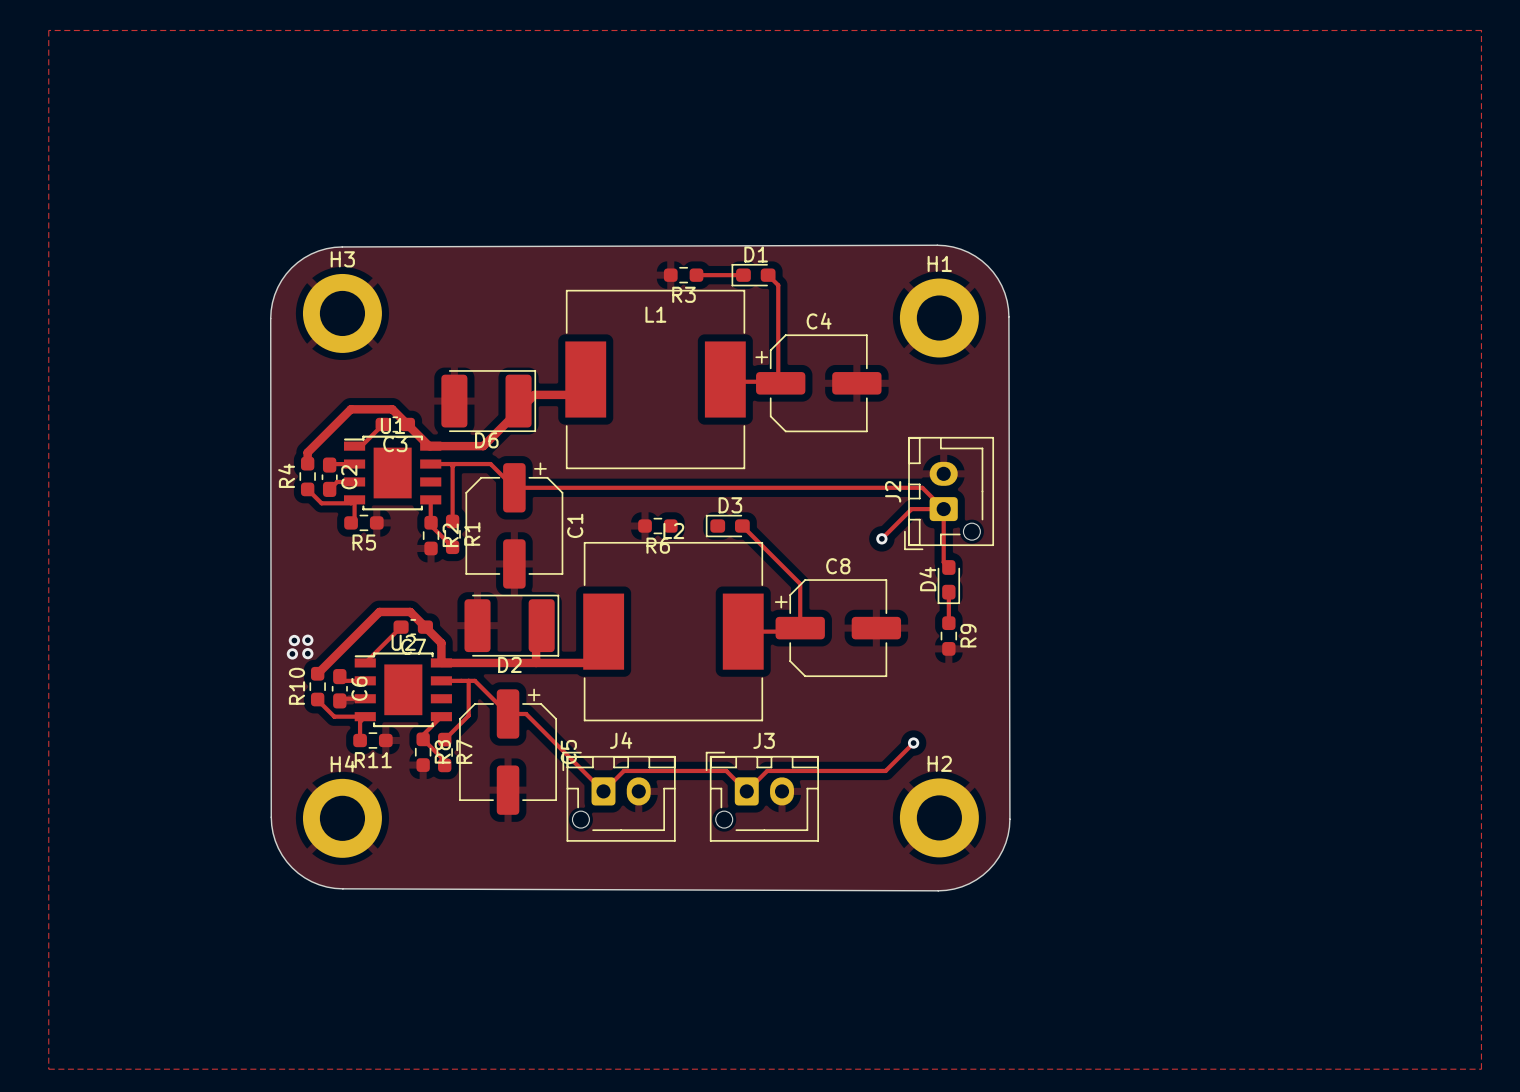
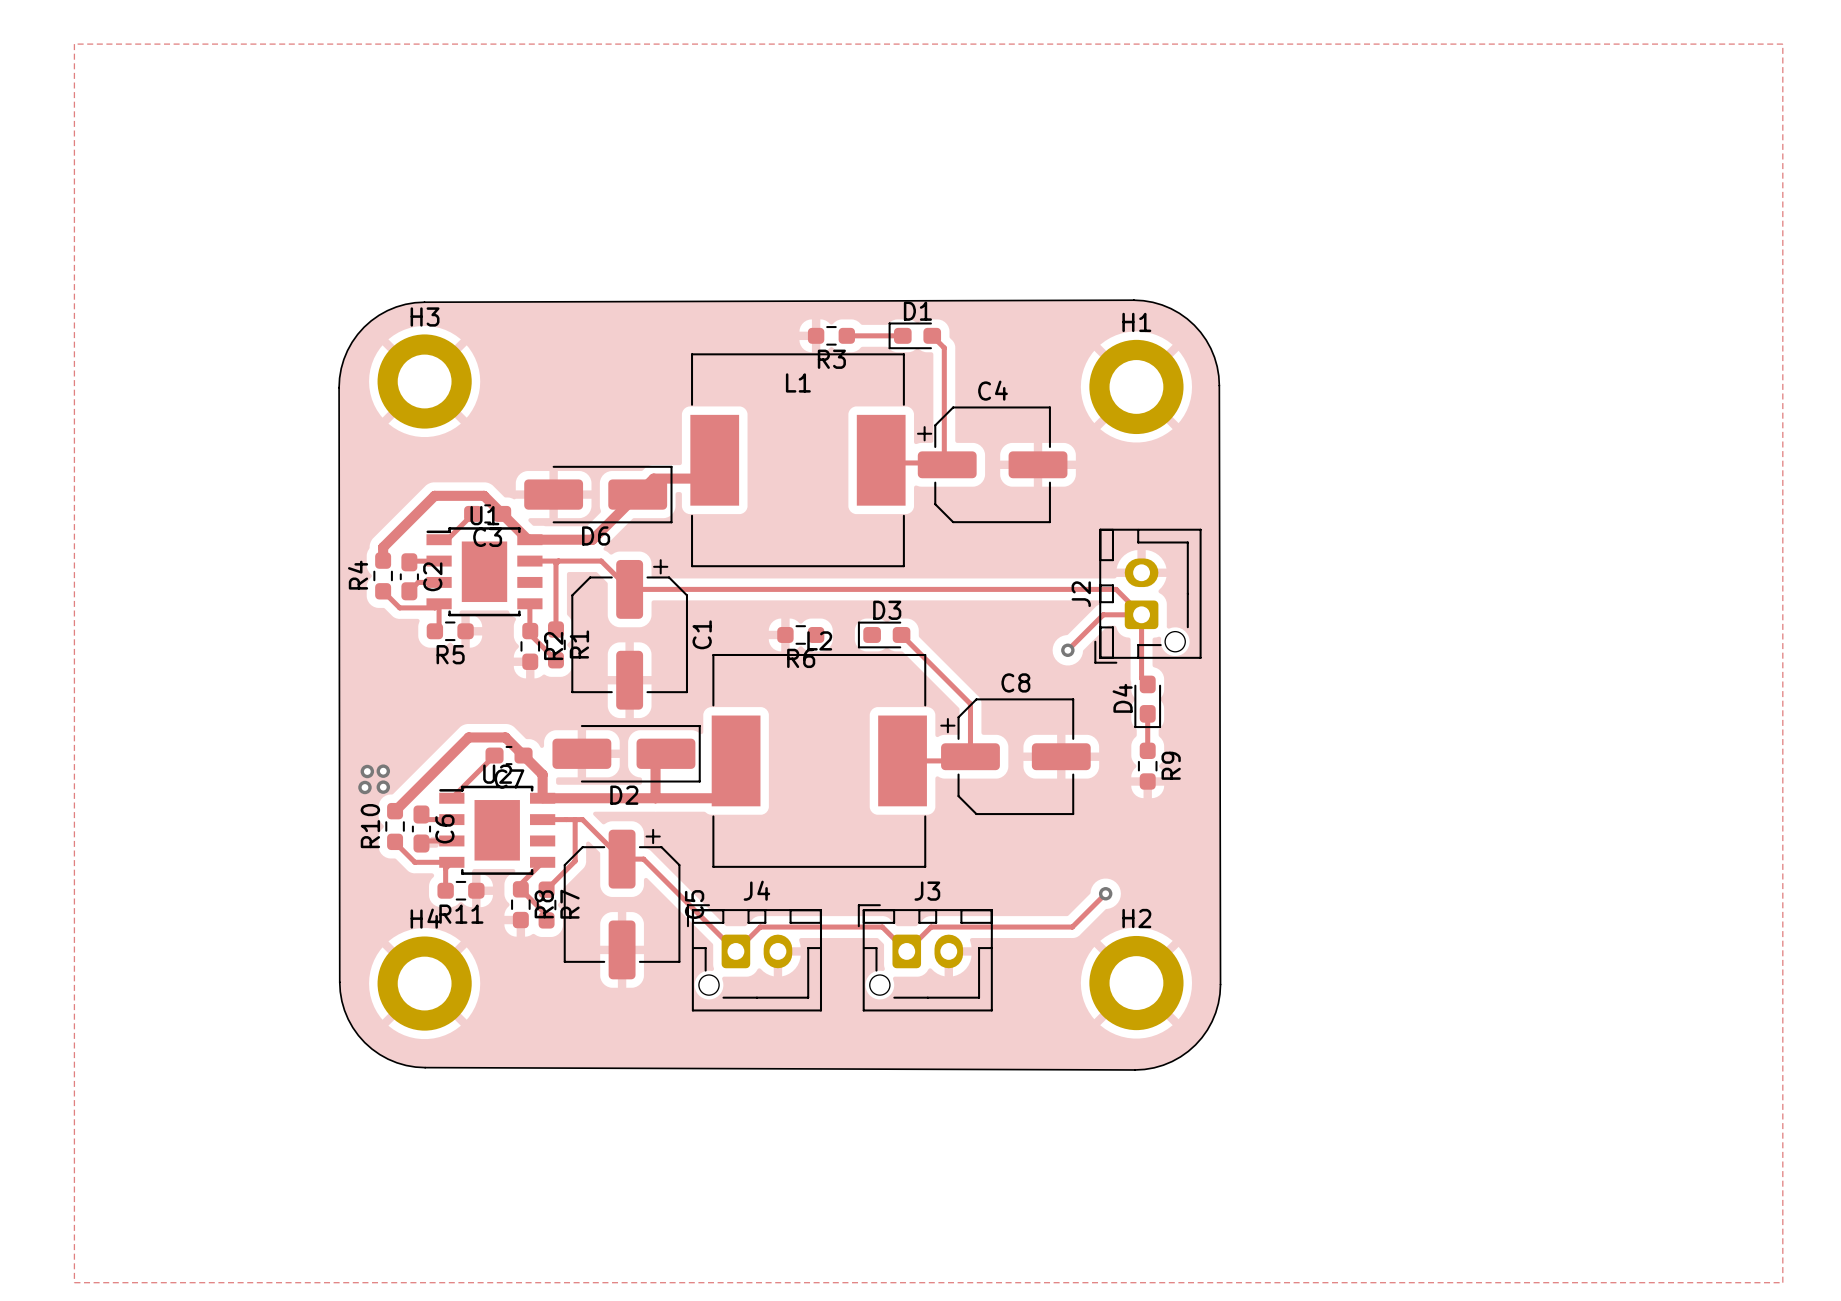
D6 footprint: [441, 370, 537, 433] -> [524, 465, 673, 524]
D2 footprint: [464, 594, 560, 657] -> [552, 725, 701, 783]

